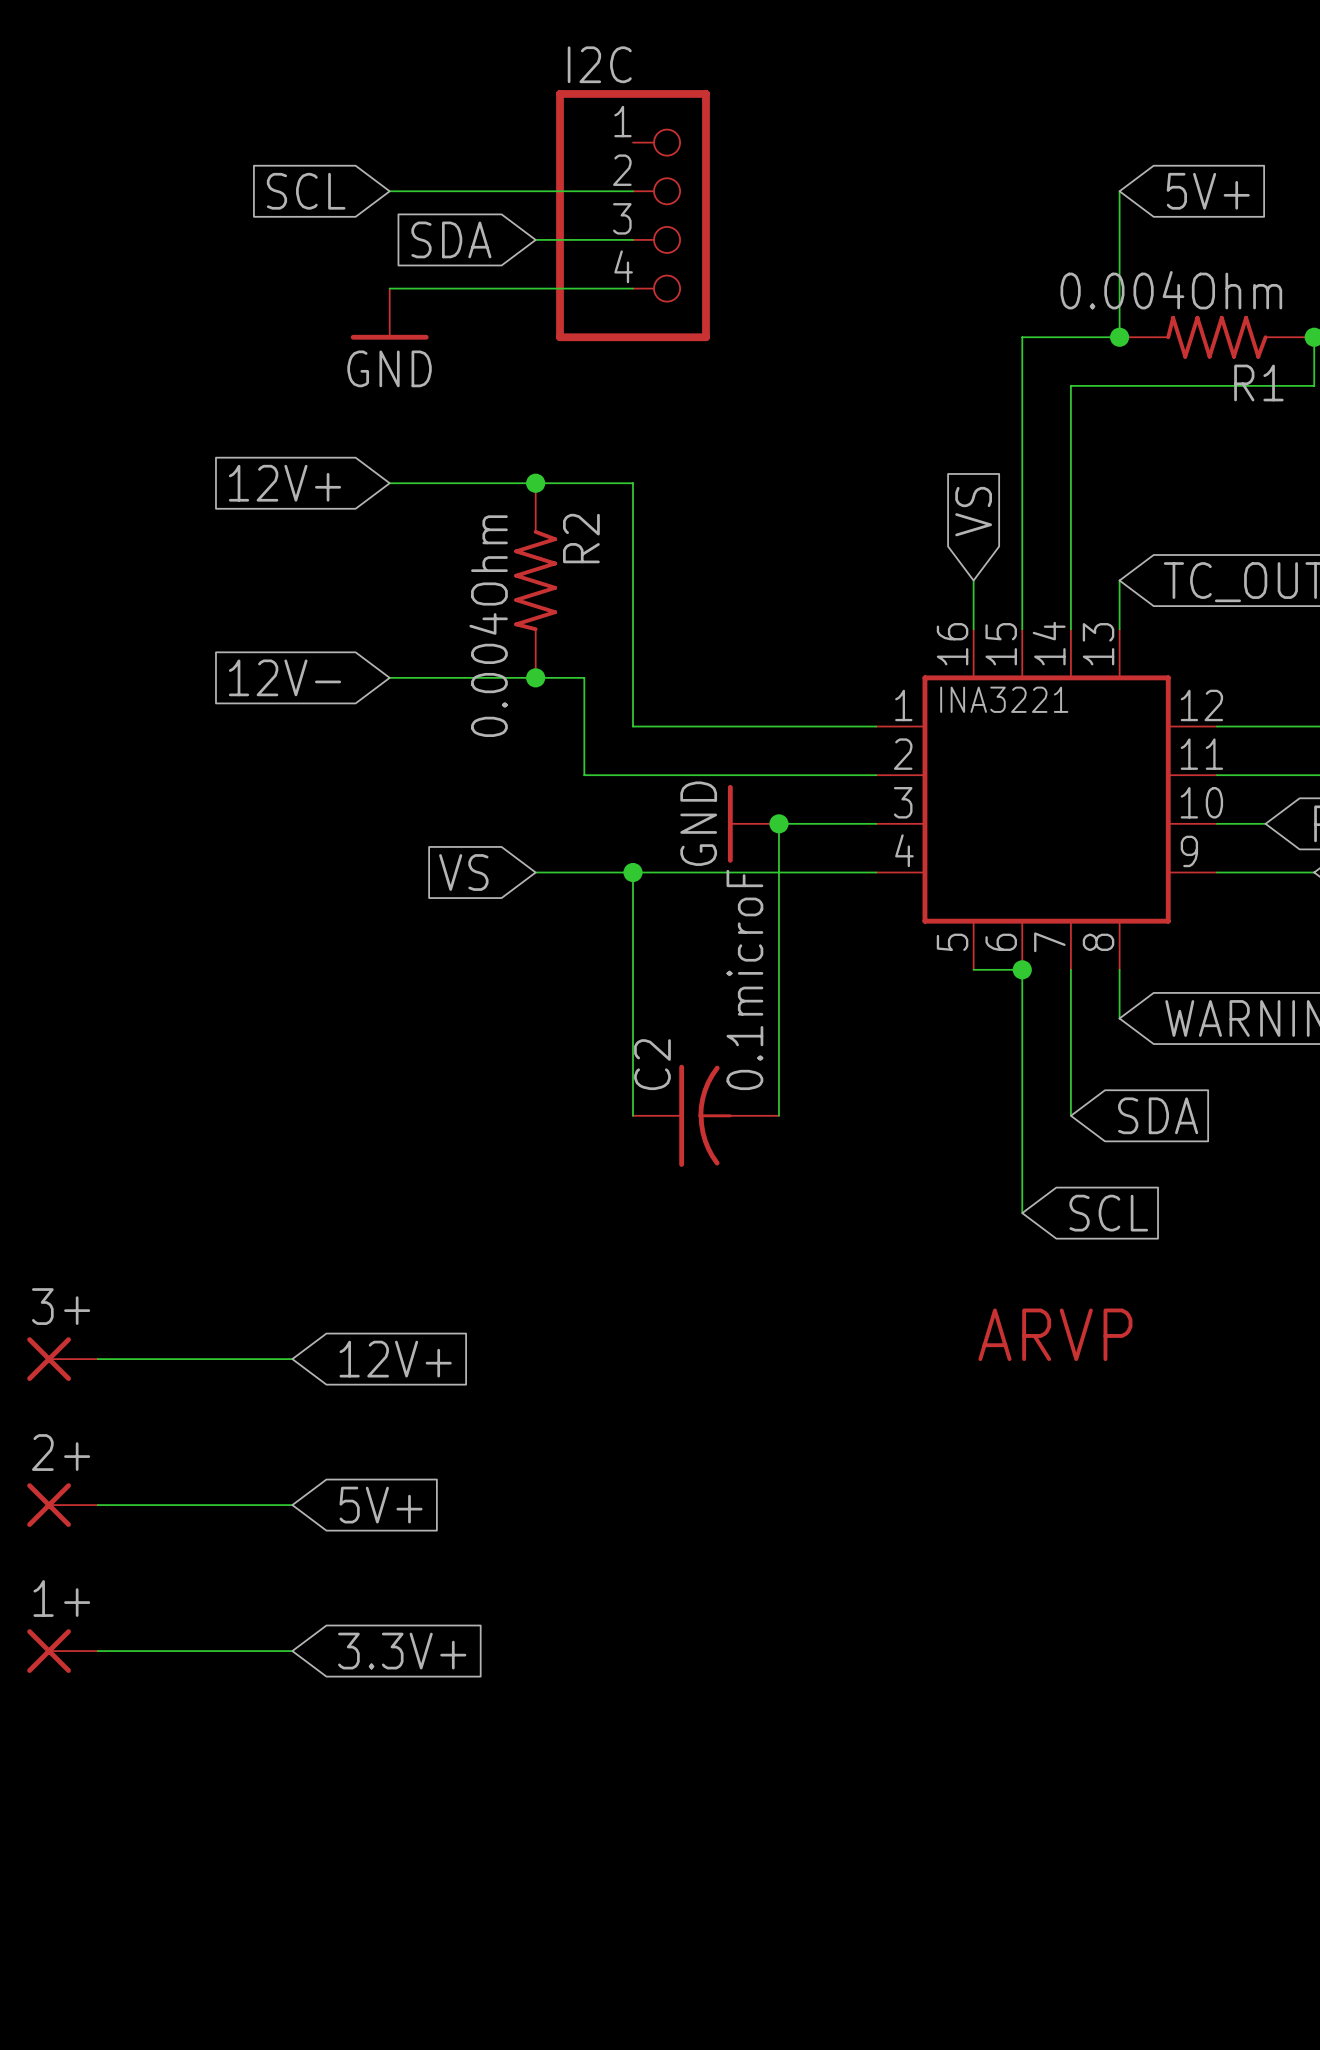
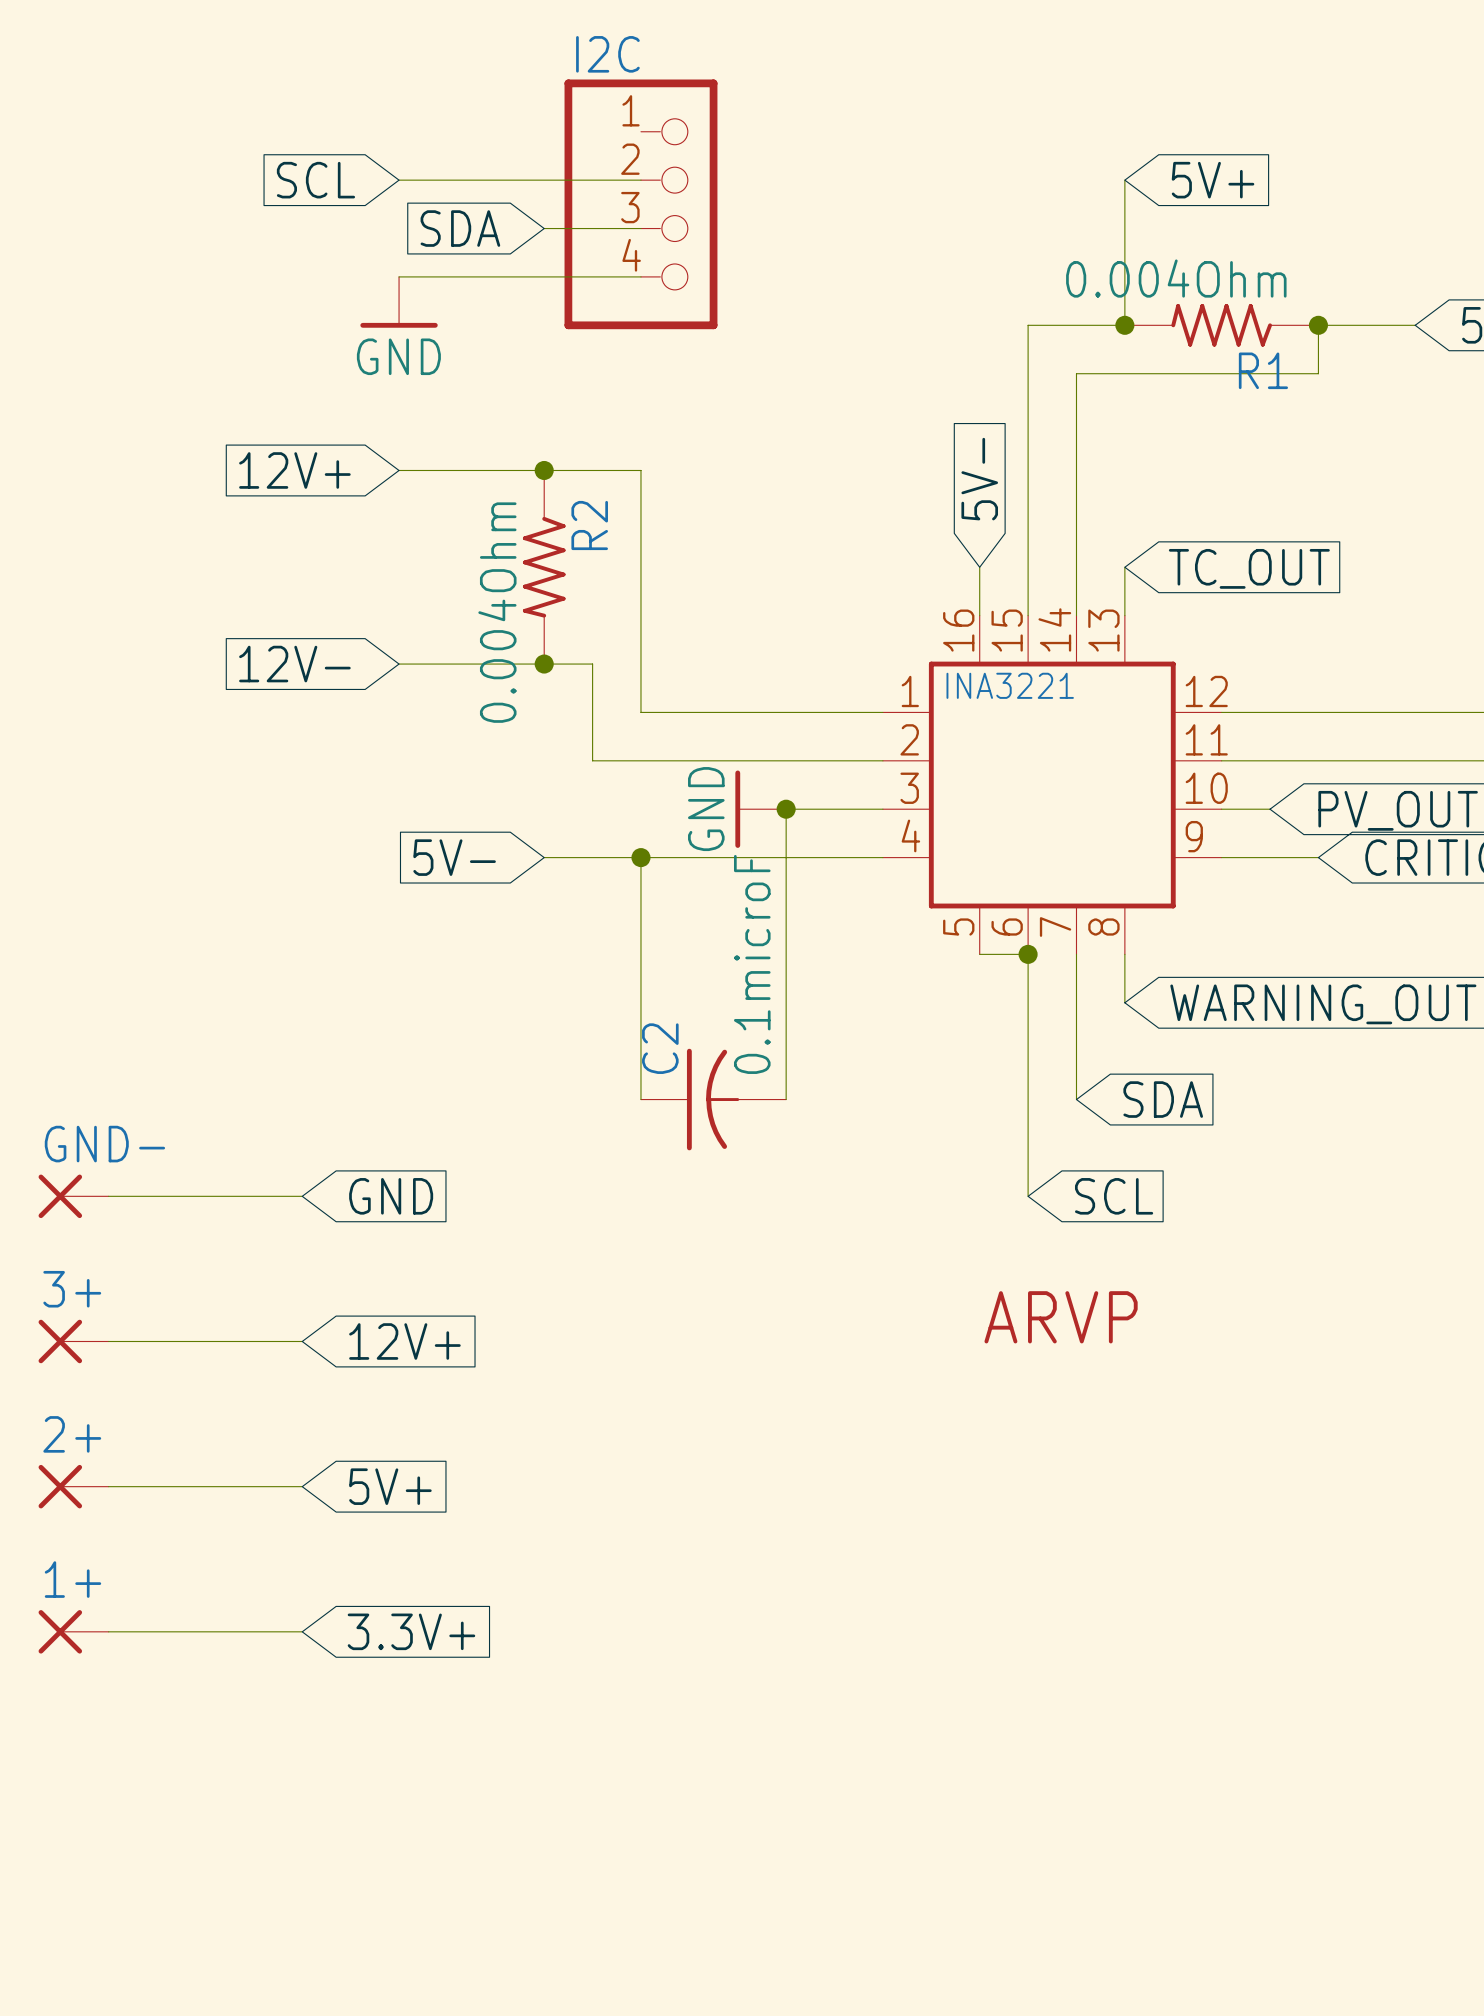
global label: VS (973, 511) -> 5V- (979, 479)
global label: VS (463, 872) -> 5V- (454, 857)
GND-: none -> (73, 1196)
wire: none -> (108, 1196) (302, 1196)
global label: none -> GND (391, 1196)

